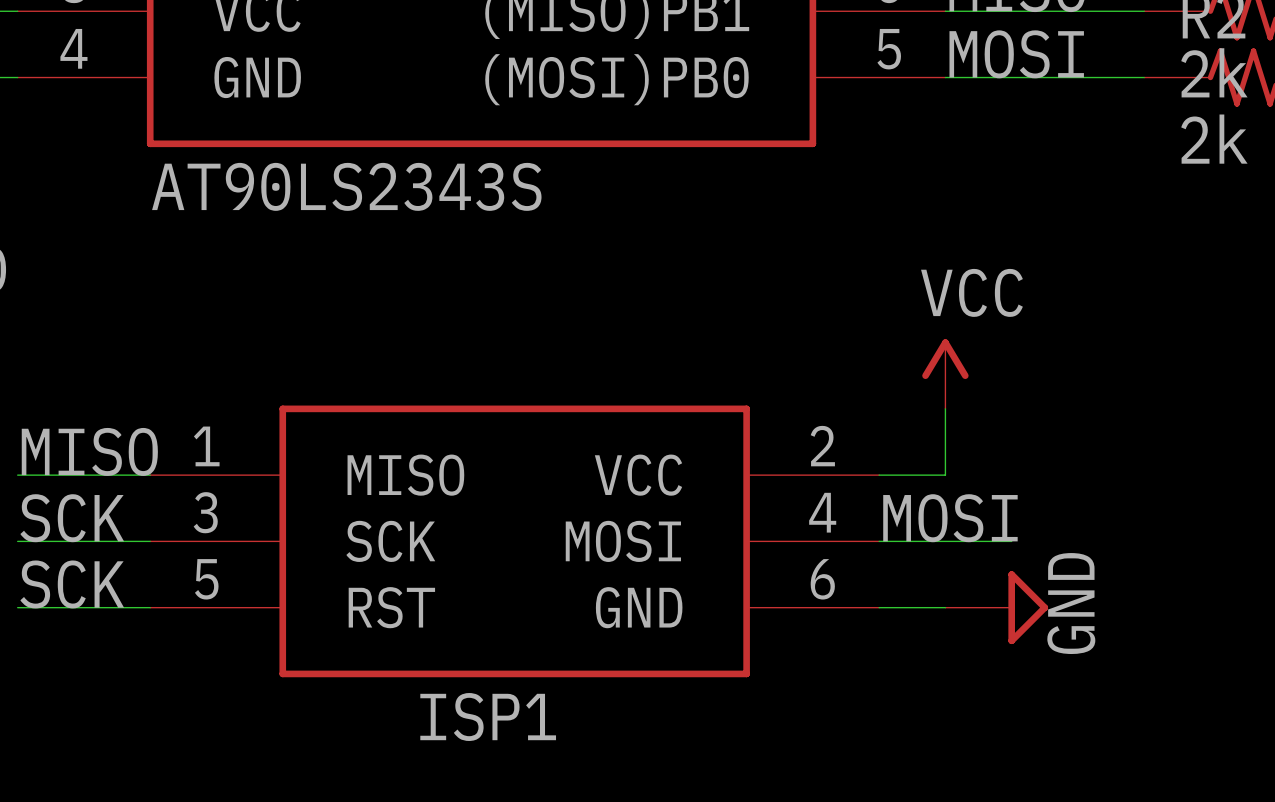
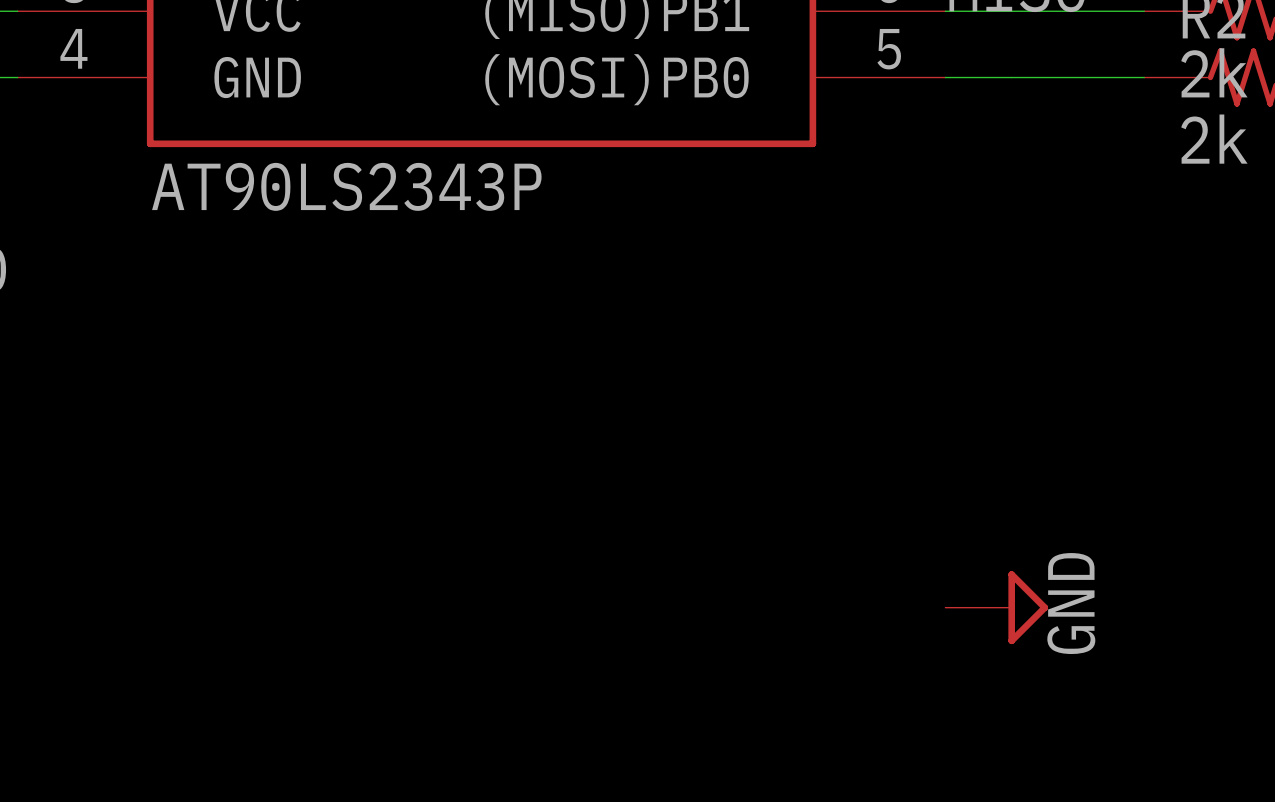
label: MOSI (1016, 54) -> none
part value: AT90LS2343S (346, 186) -> AT90LS2343P (346, 186)
power symbol: VCC (945, 374) -> none
wire: (945, 408) (945, 475) (879, 475) -> none
label: MISO (89, 451) -> none
wire: (17, 475) (150, 475) -> none
label: SCK (72, 518) -> none
label: MOSI (950, 518) -> none
wire: (17, 541) (150, 541) -> none
ISP1: (514, 541) -> none
wire: (879, 541) (1011, 541) -> none
label: SCK (72, 584) -> none
wire: (17, 607) (150, 607) -> none
wire: (879, 607) (945, 607) -> none

